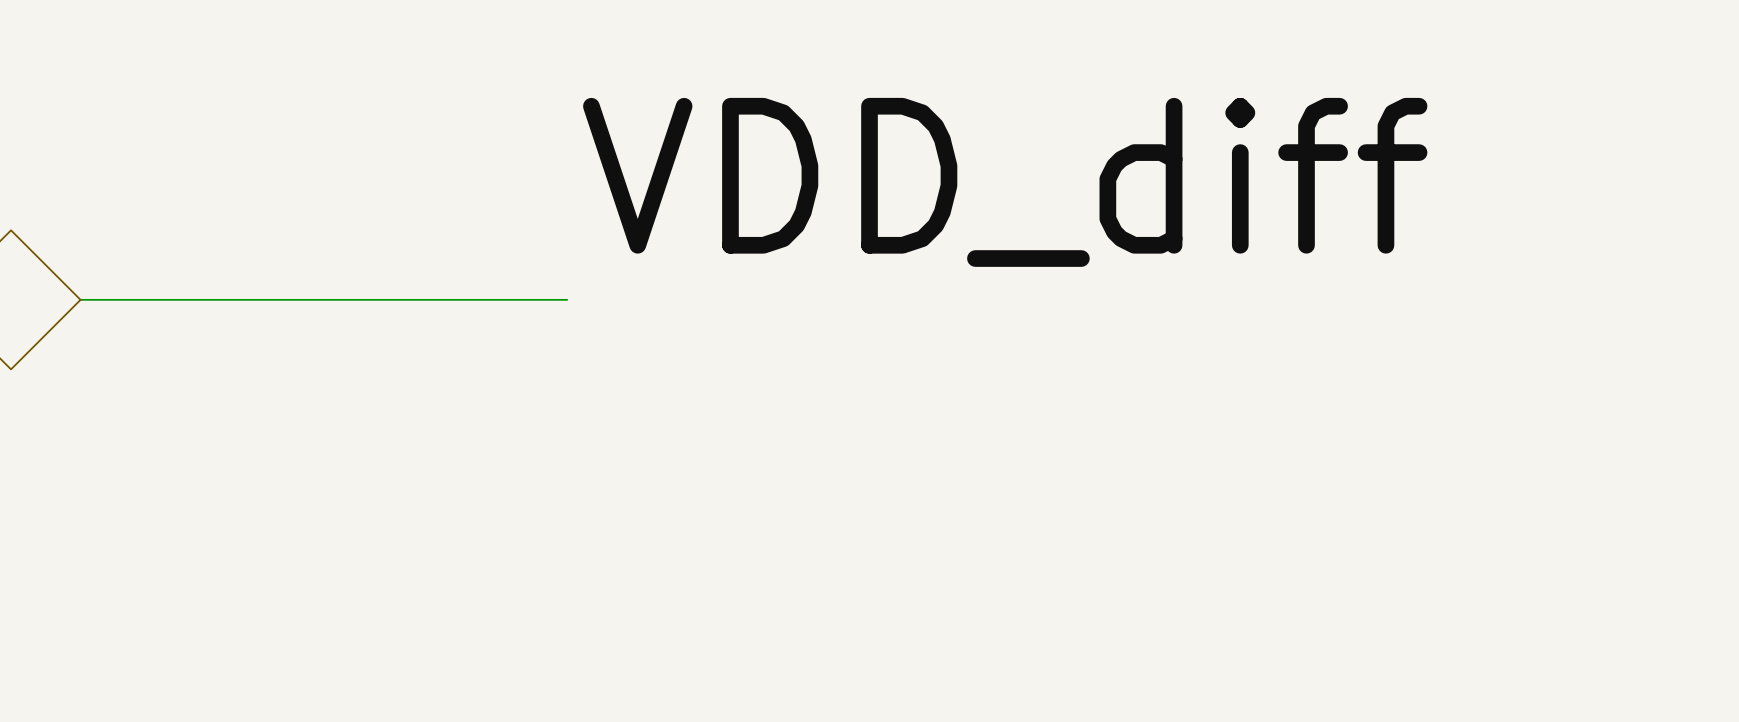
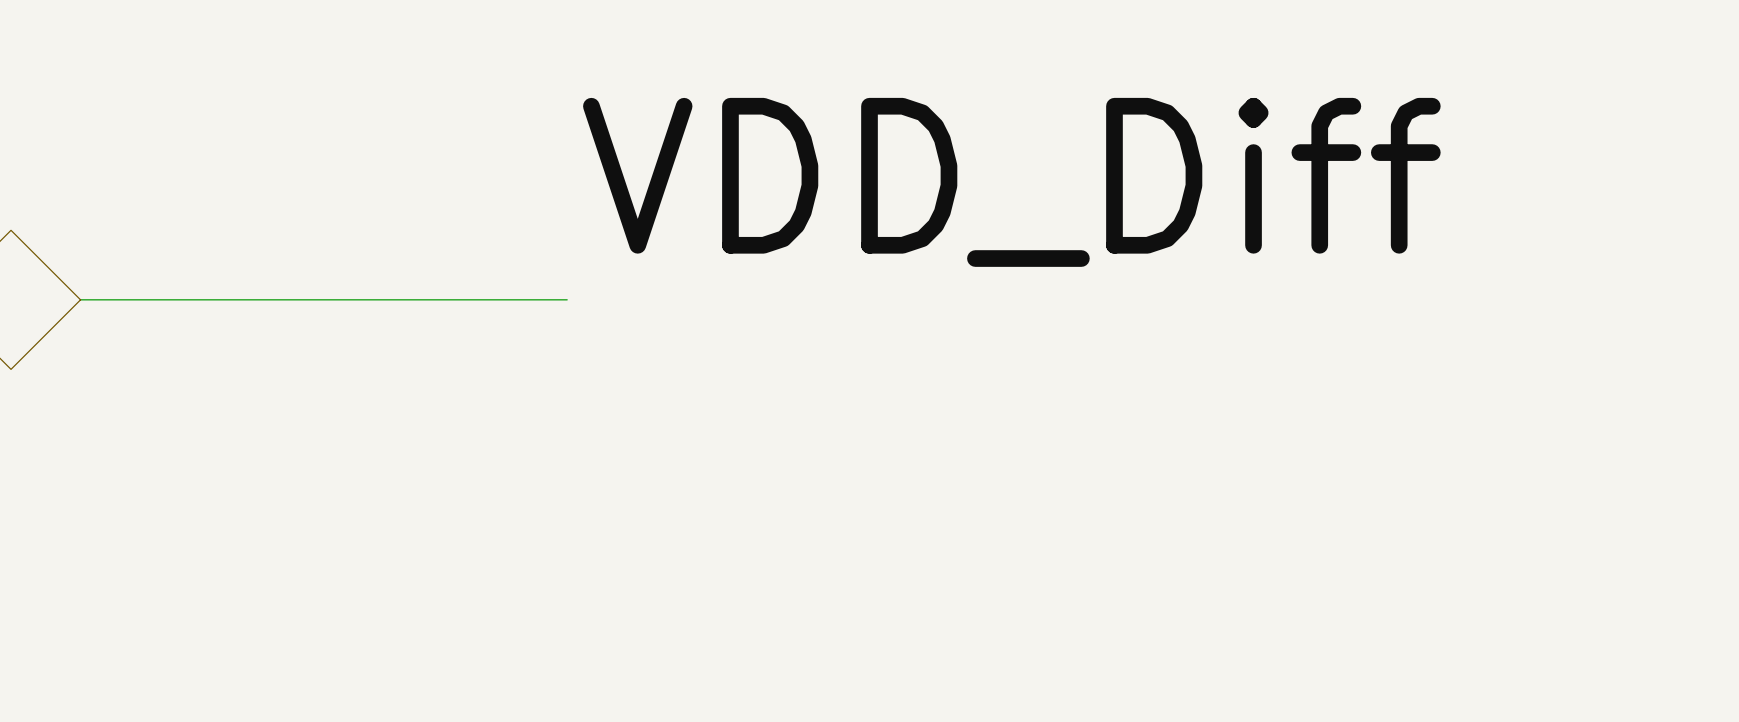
label: VDD_diff (1005, 182) -> VDD_Diff (1011, 182)

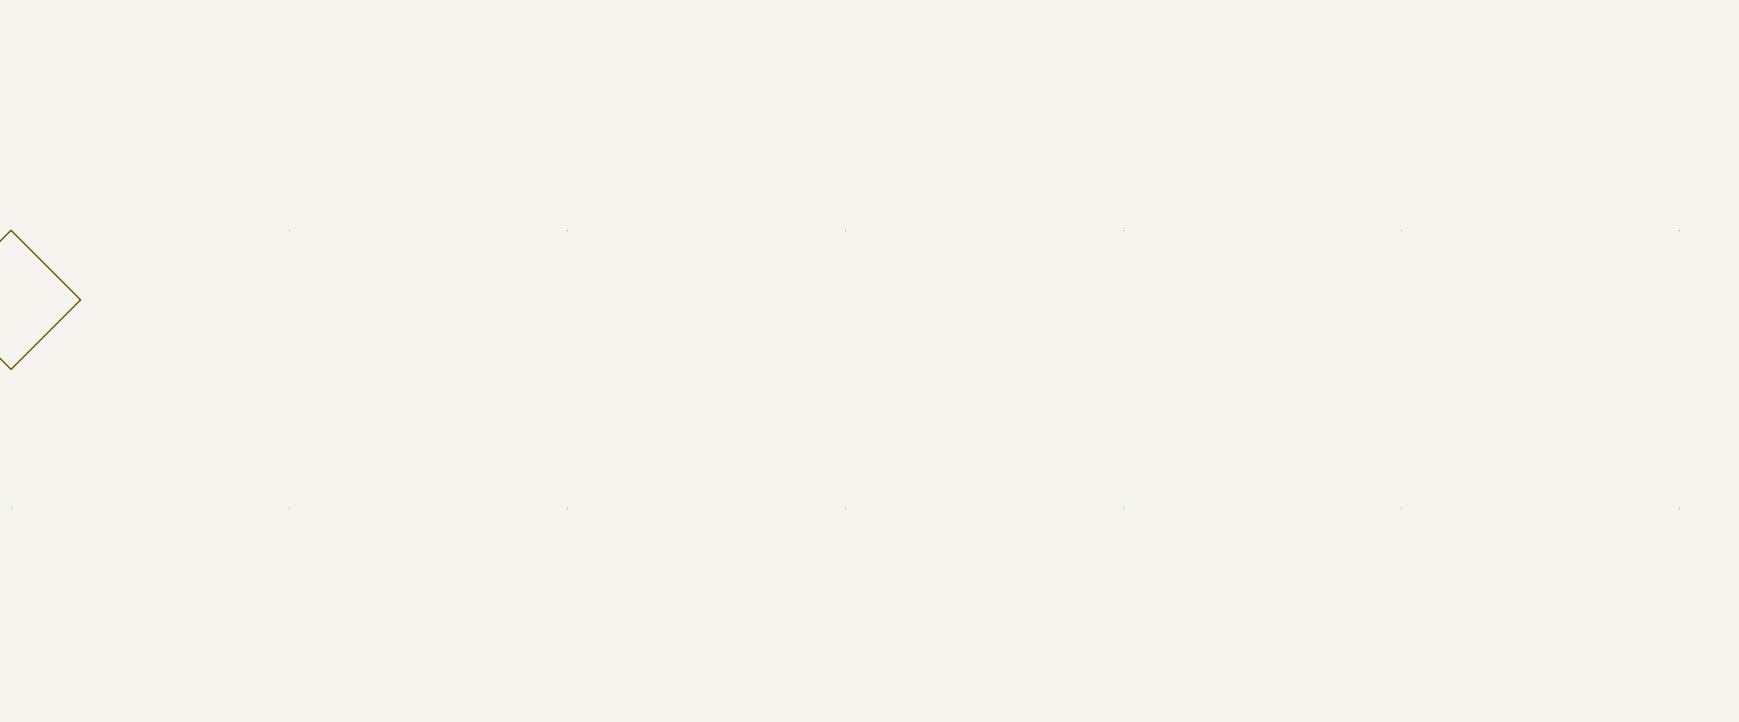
label: VDD_Diff (1011, 182) -> none
wire: (80, 299) (567, 299) -> none

